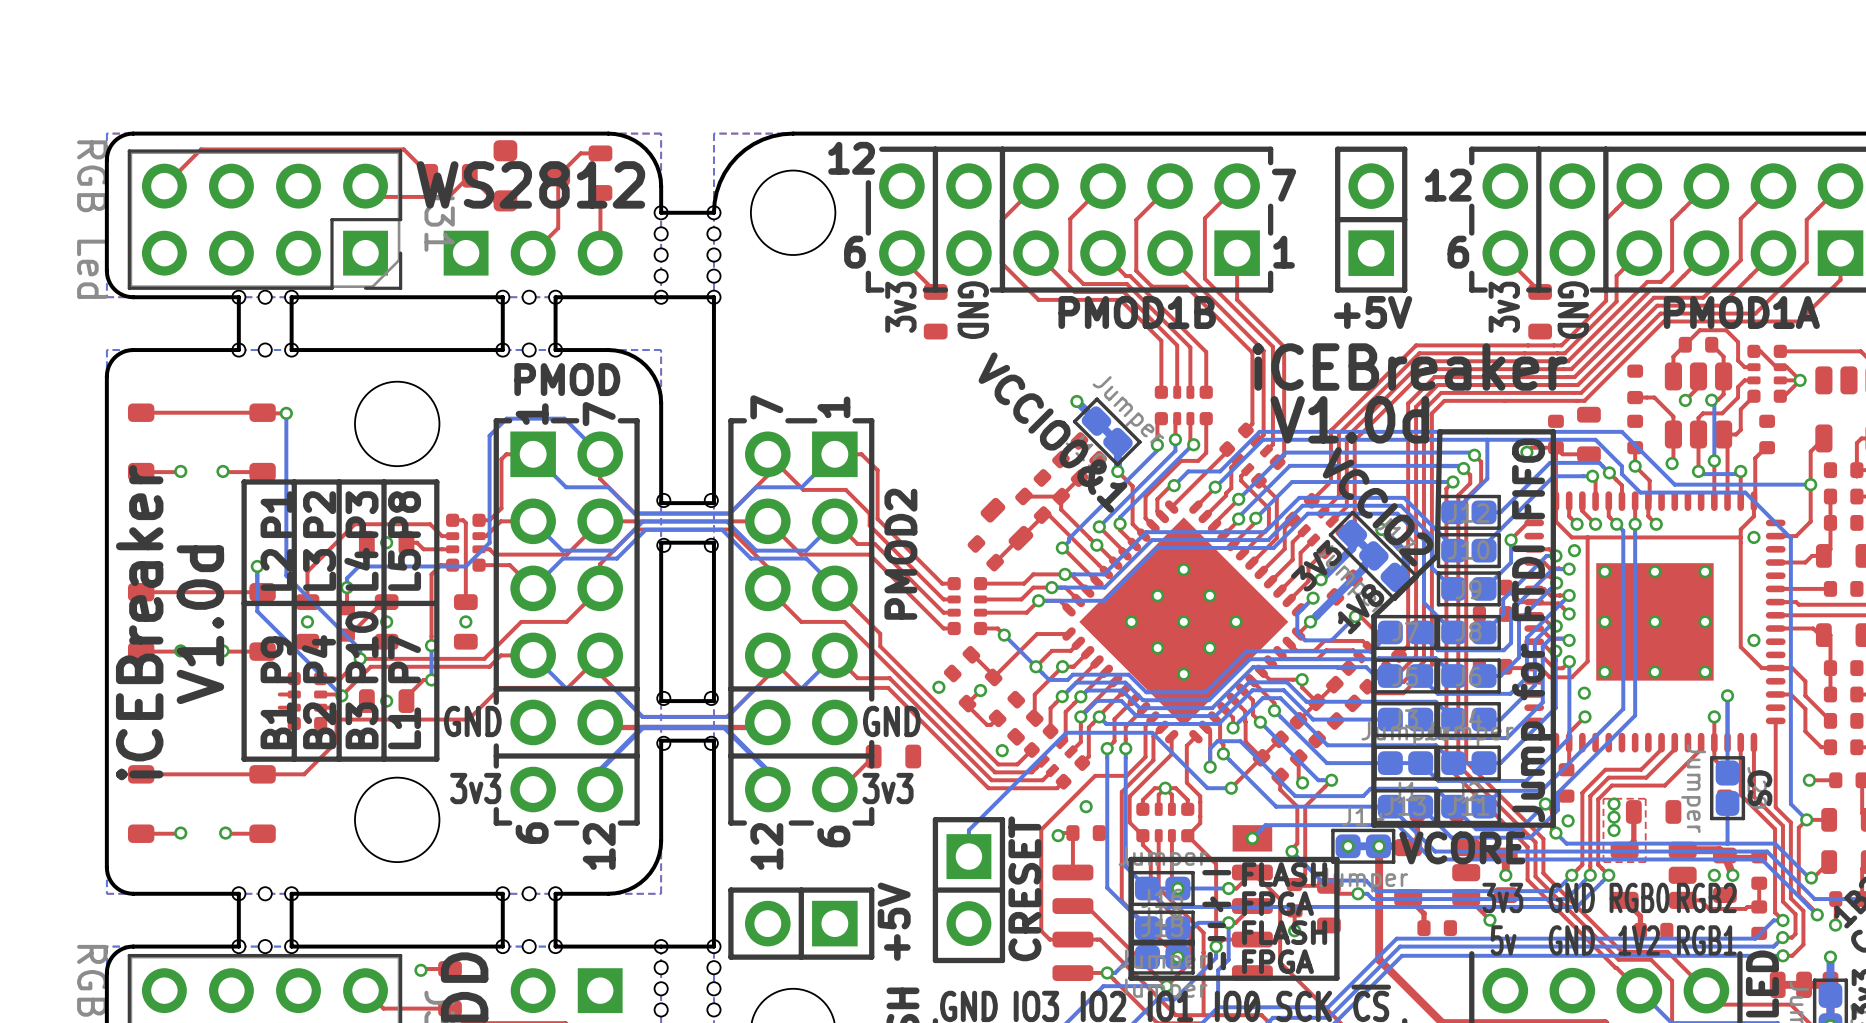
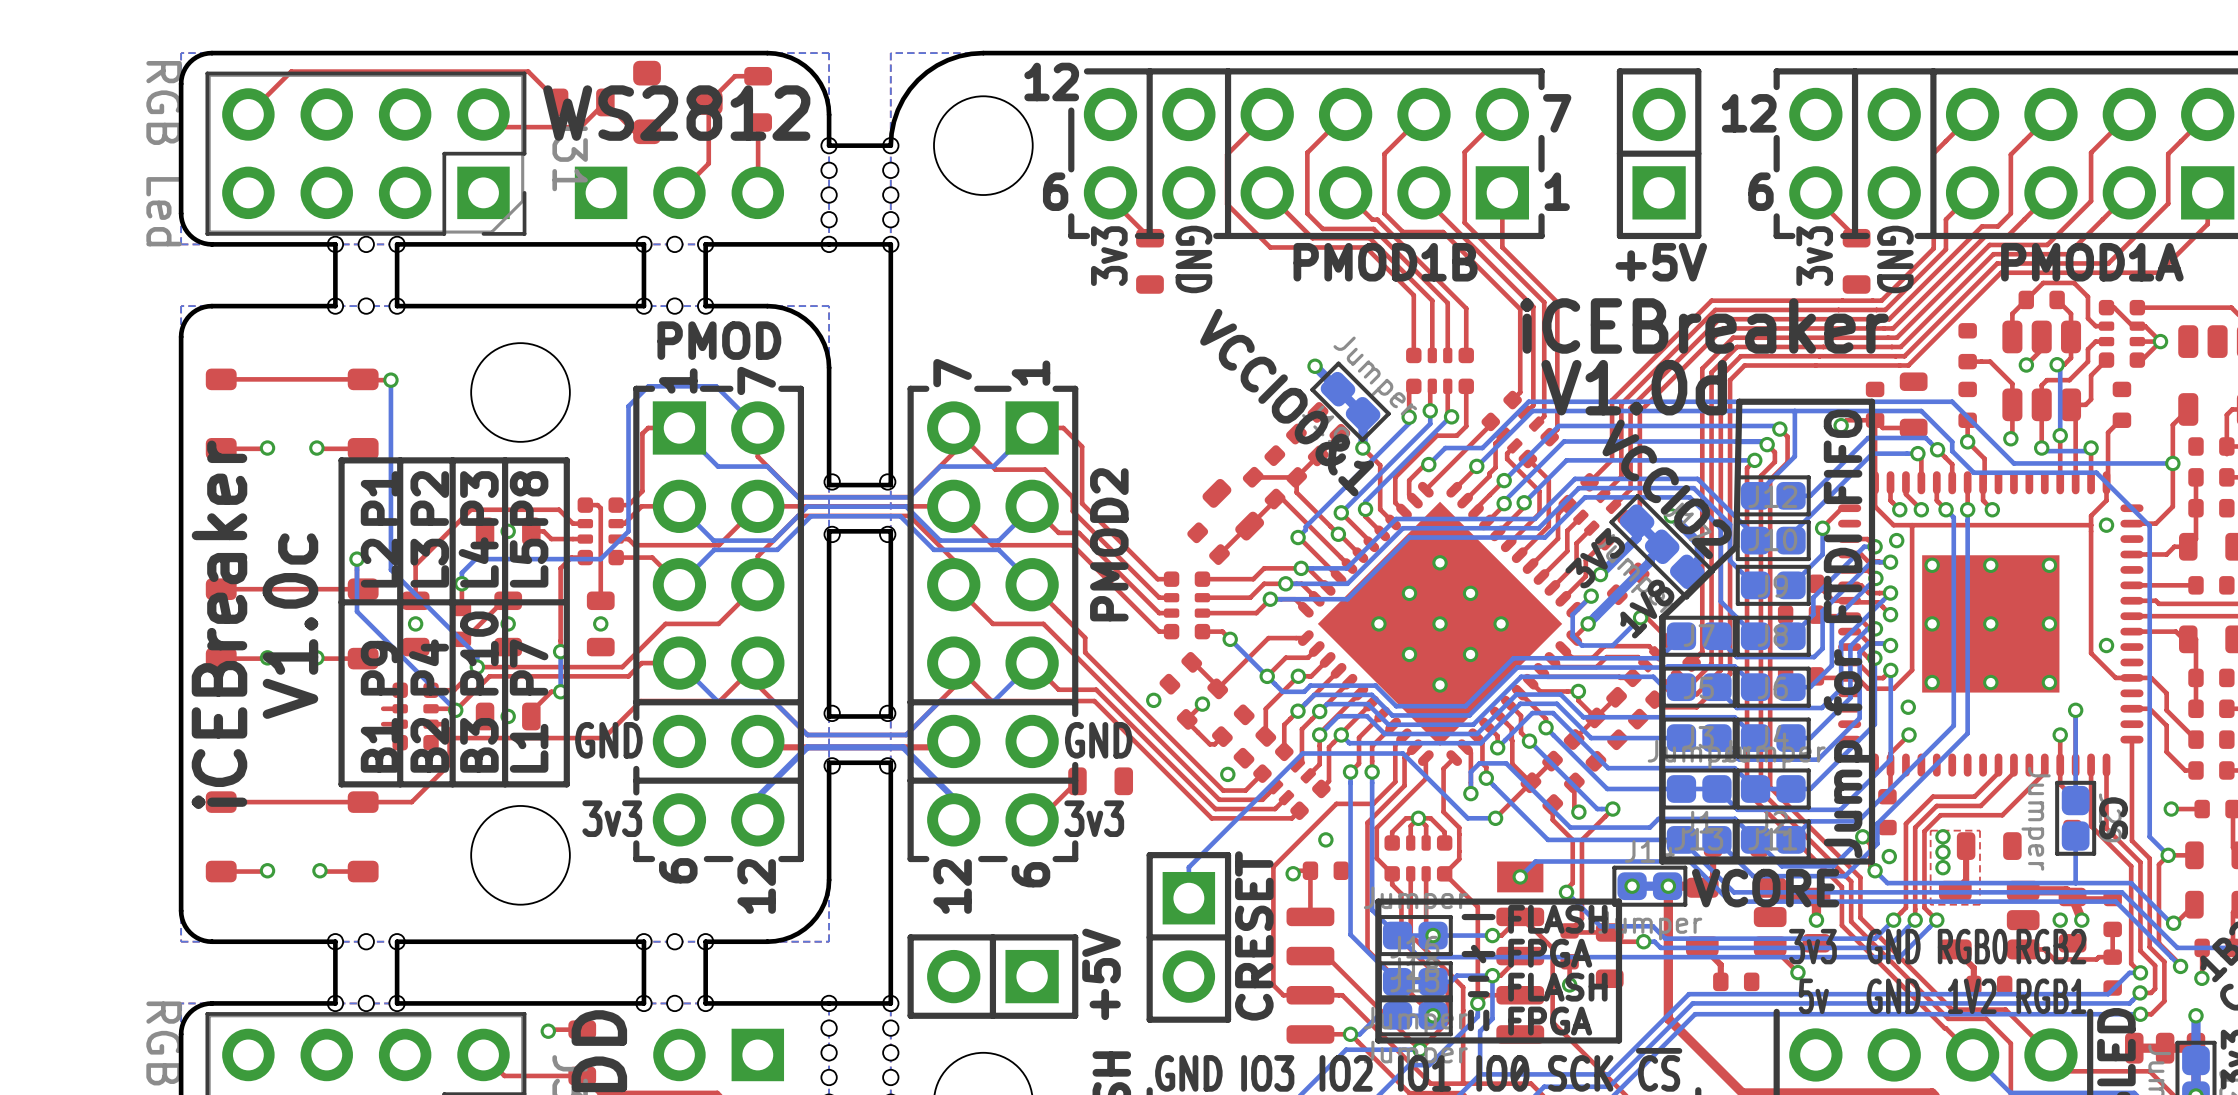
text: V1.0d (200, 624) -> V1.0c (290, 626)

